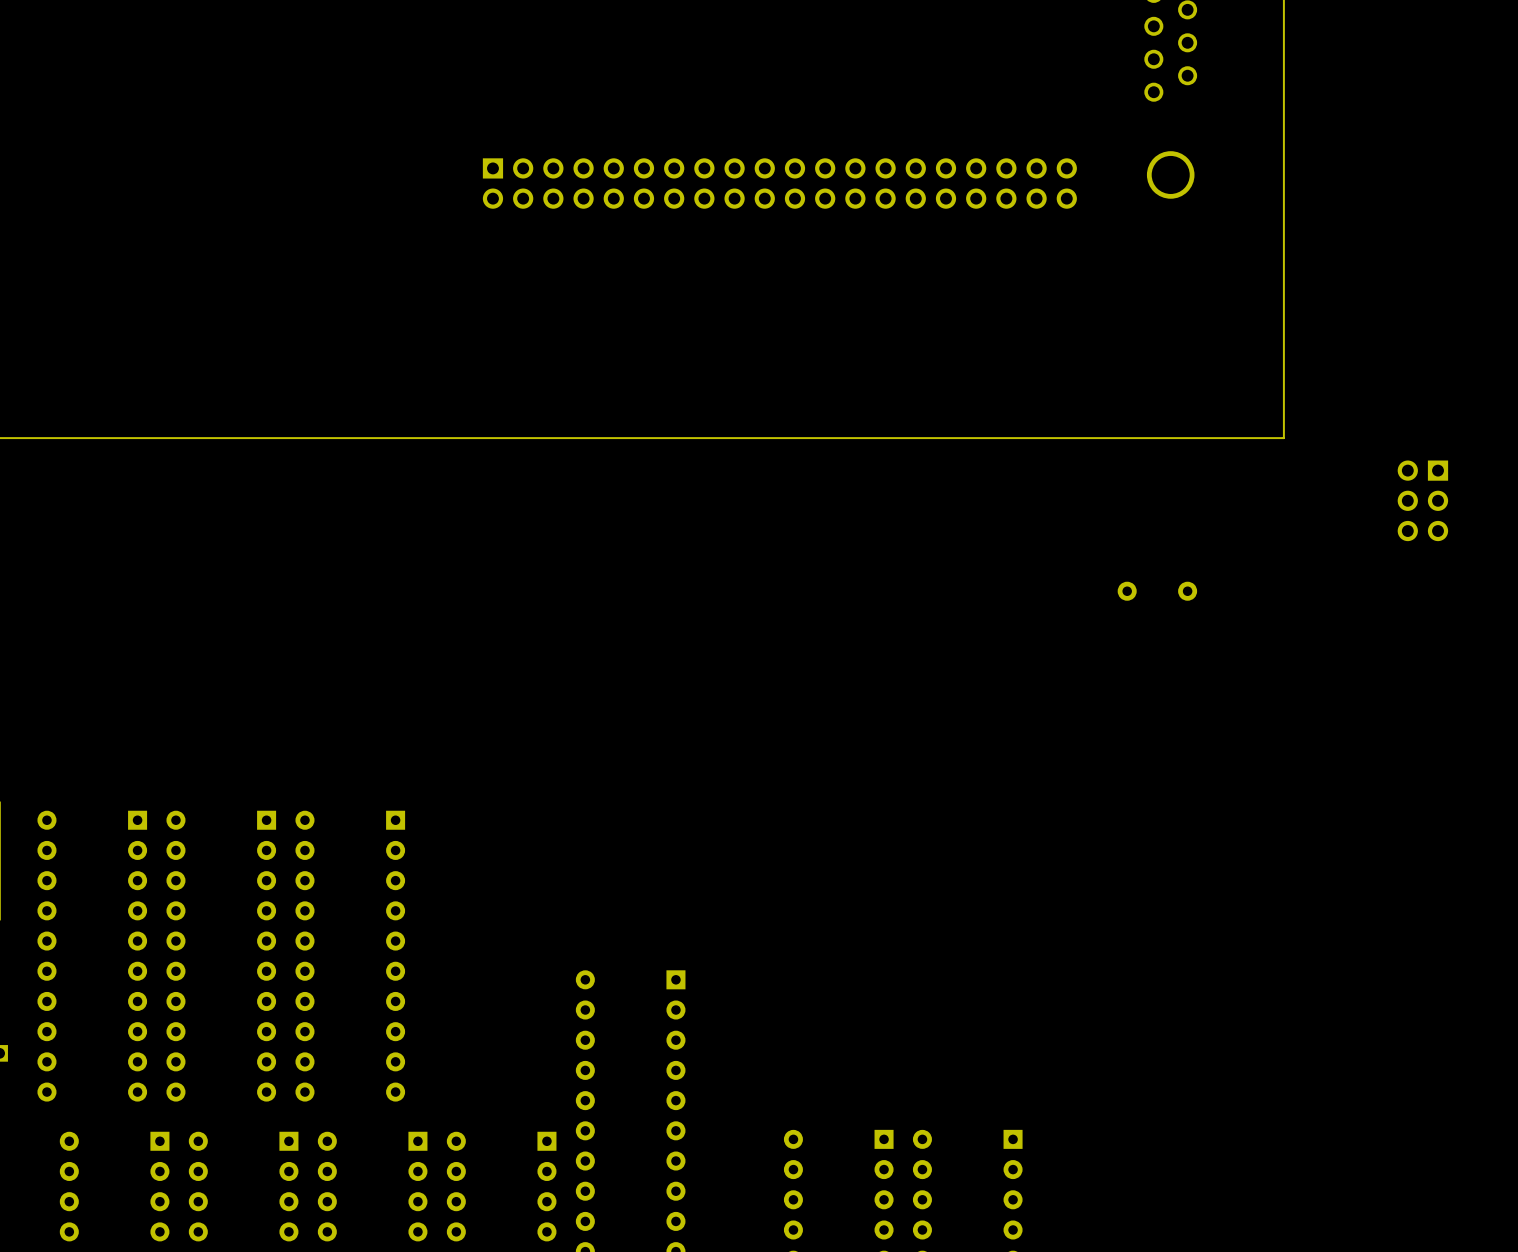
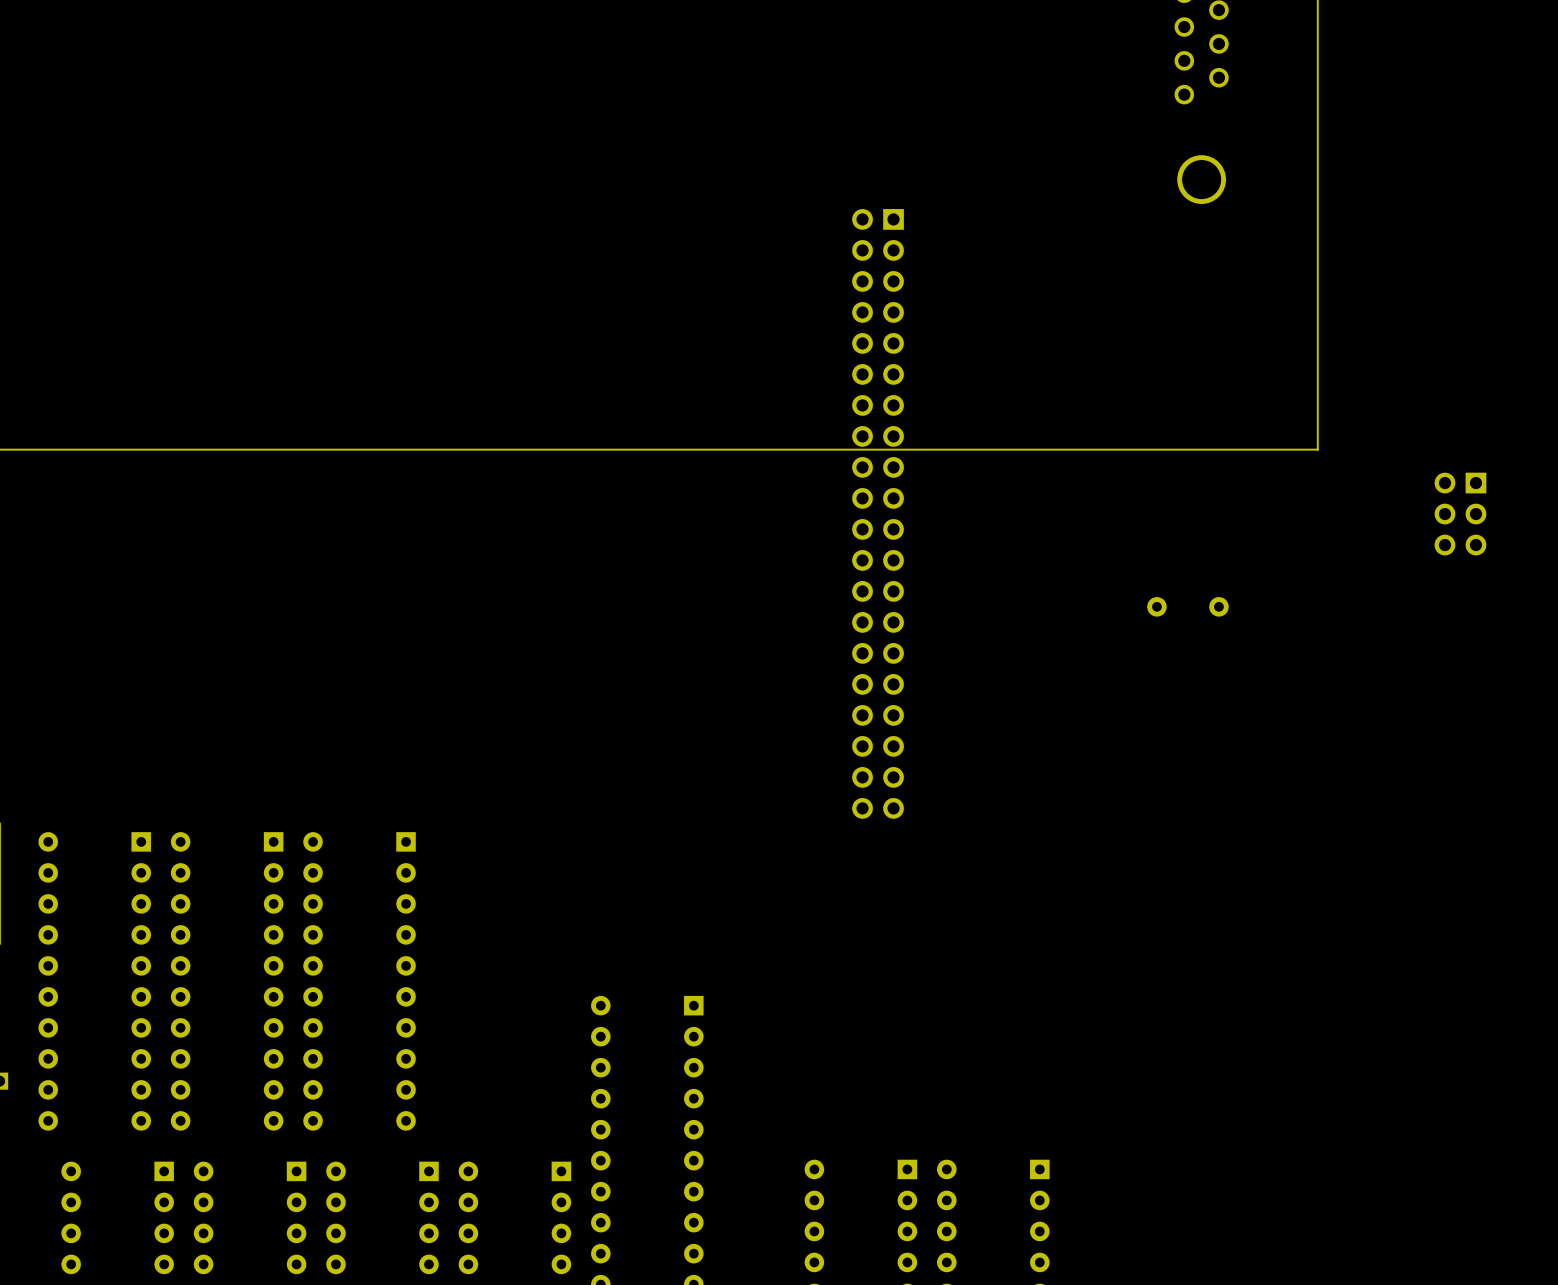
part: (779, 183) -> none
part: none -> (878, 513)

